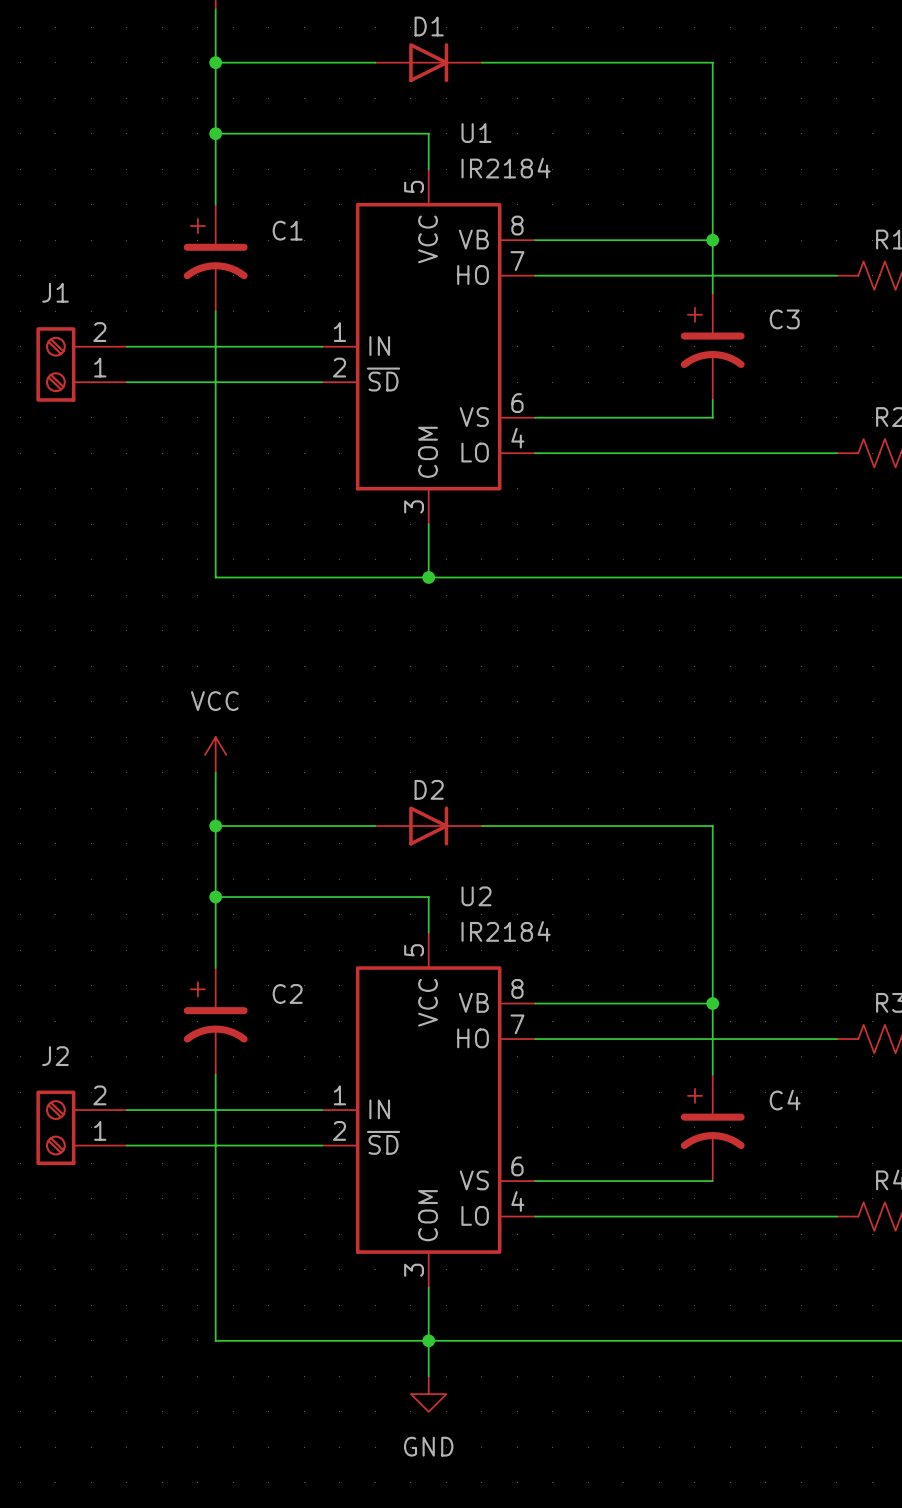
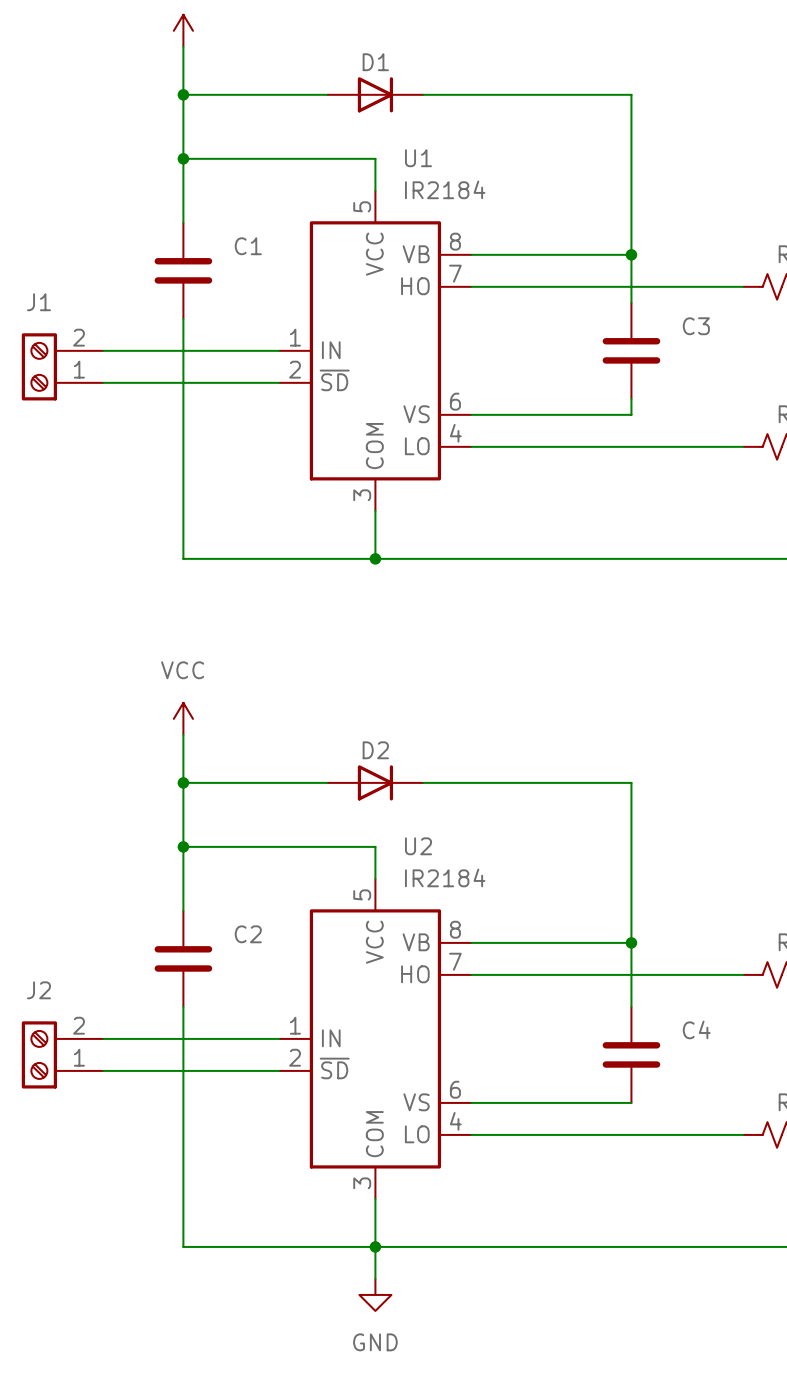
C1 symbol: [183, 204, 248, 312] -> [154, 222, 213, 319]
C3 symbol: [680, 293, 745, 400] -> [602, 302, 661, 399]
C2 symbol: [183, 968, 248, 1075] -> [154, 910, 213, 1007]
C4 symbol: [680, 1074, 745, 1182] -> [602, 1006, 661, 1103]

